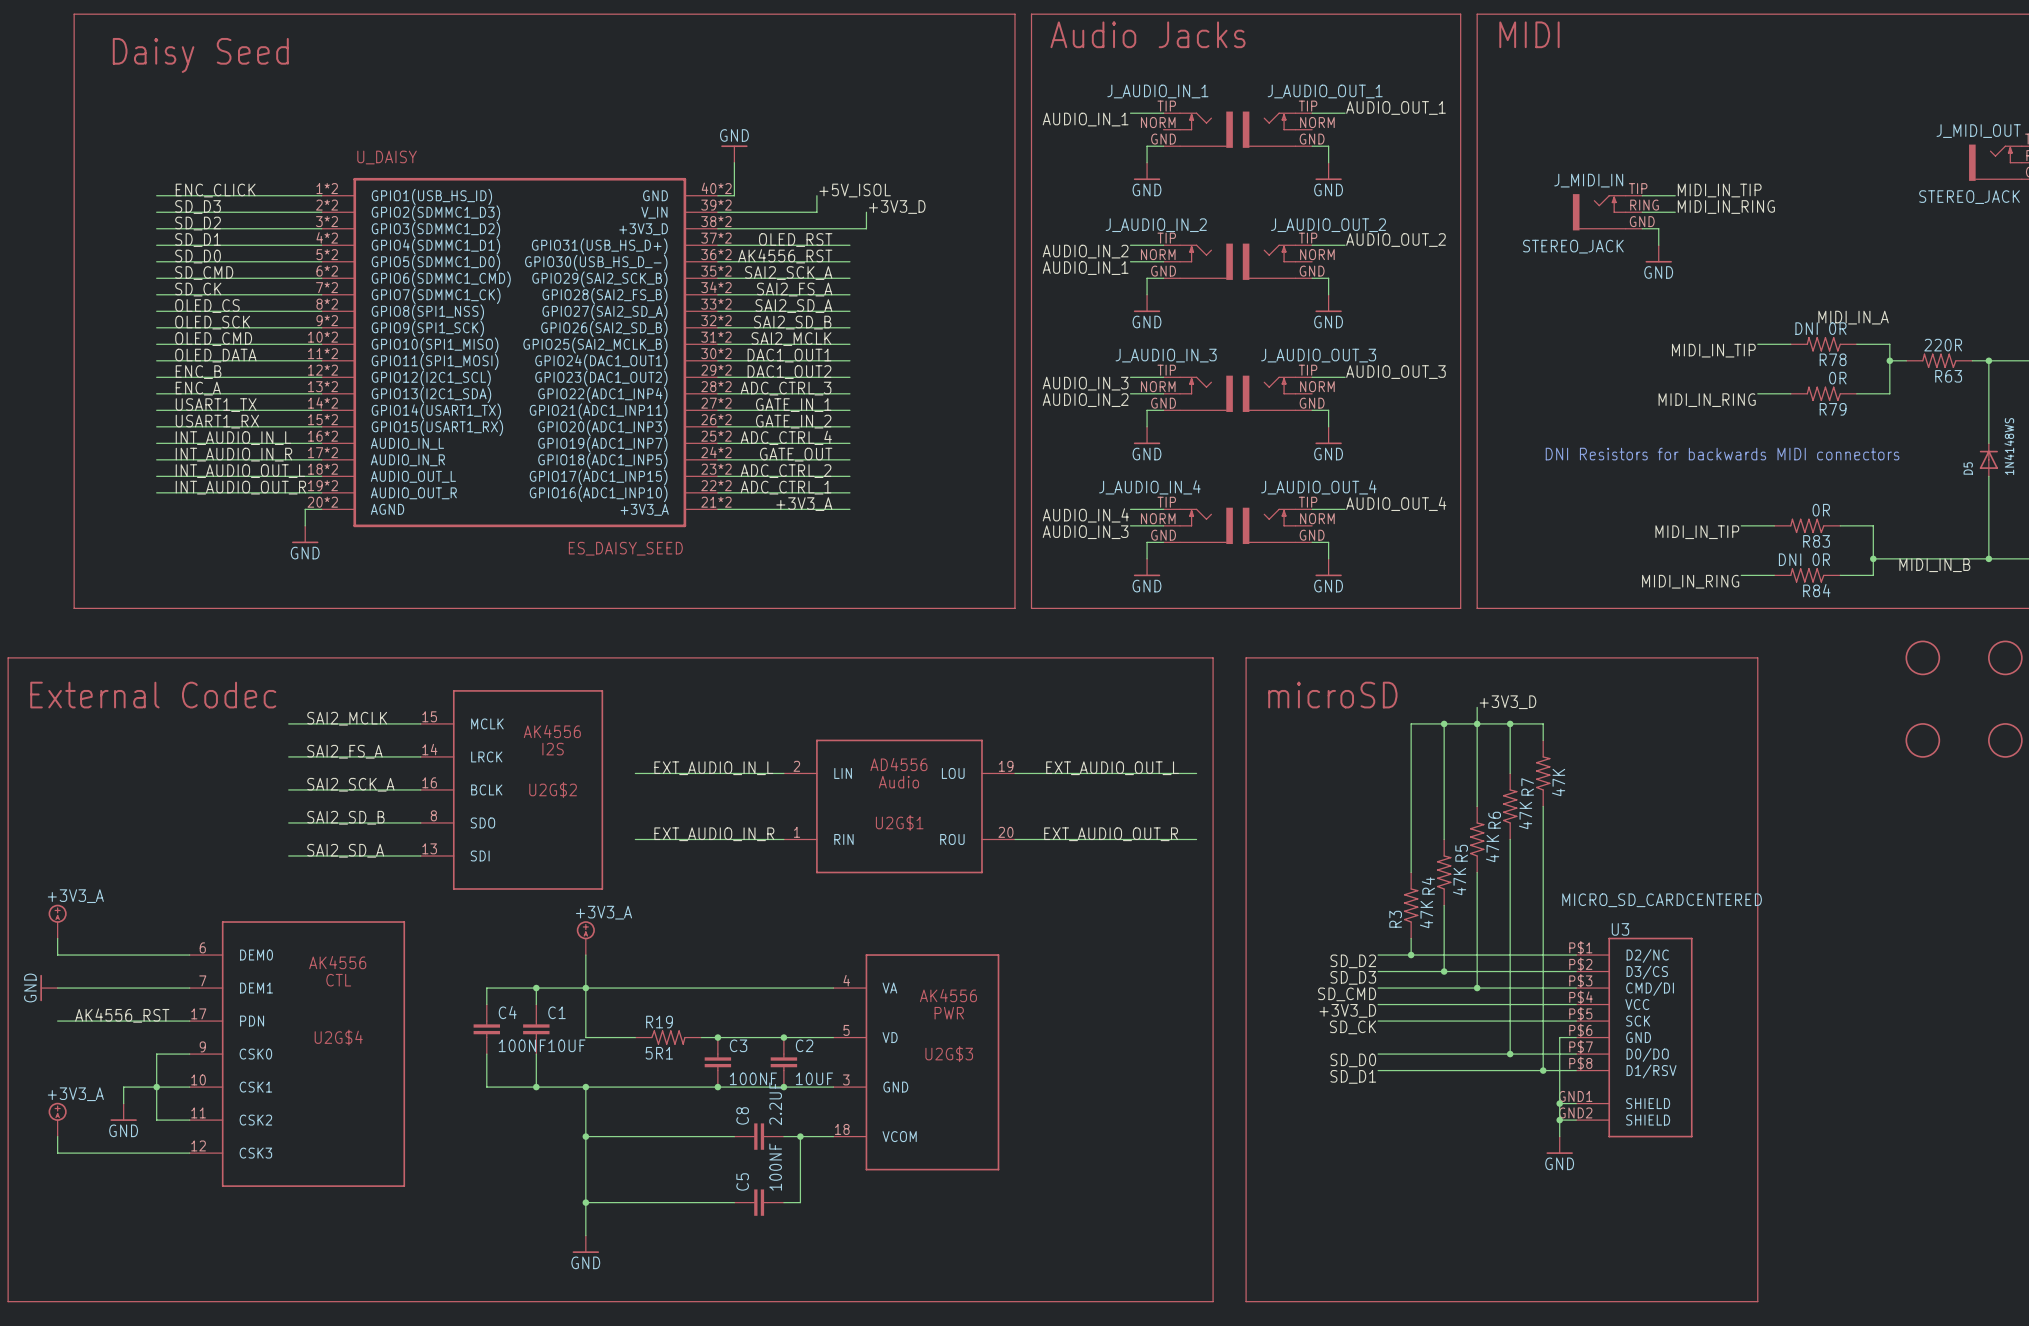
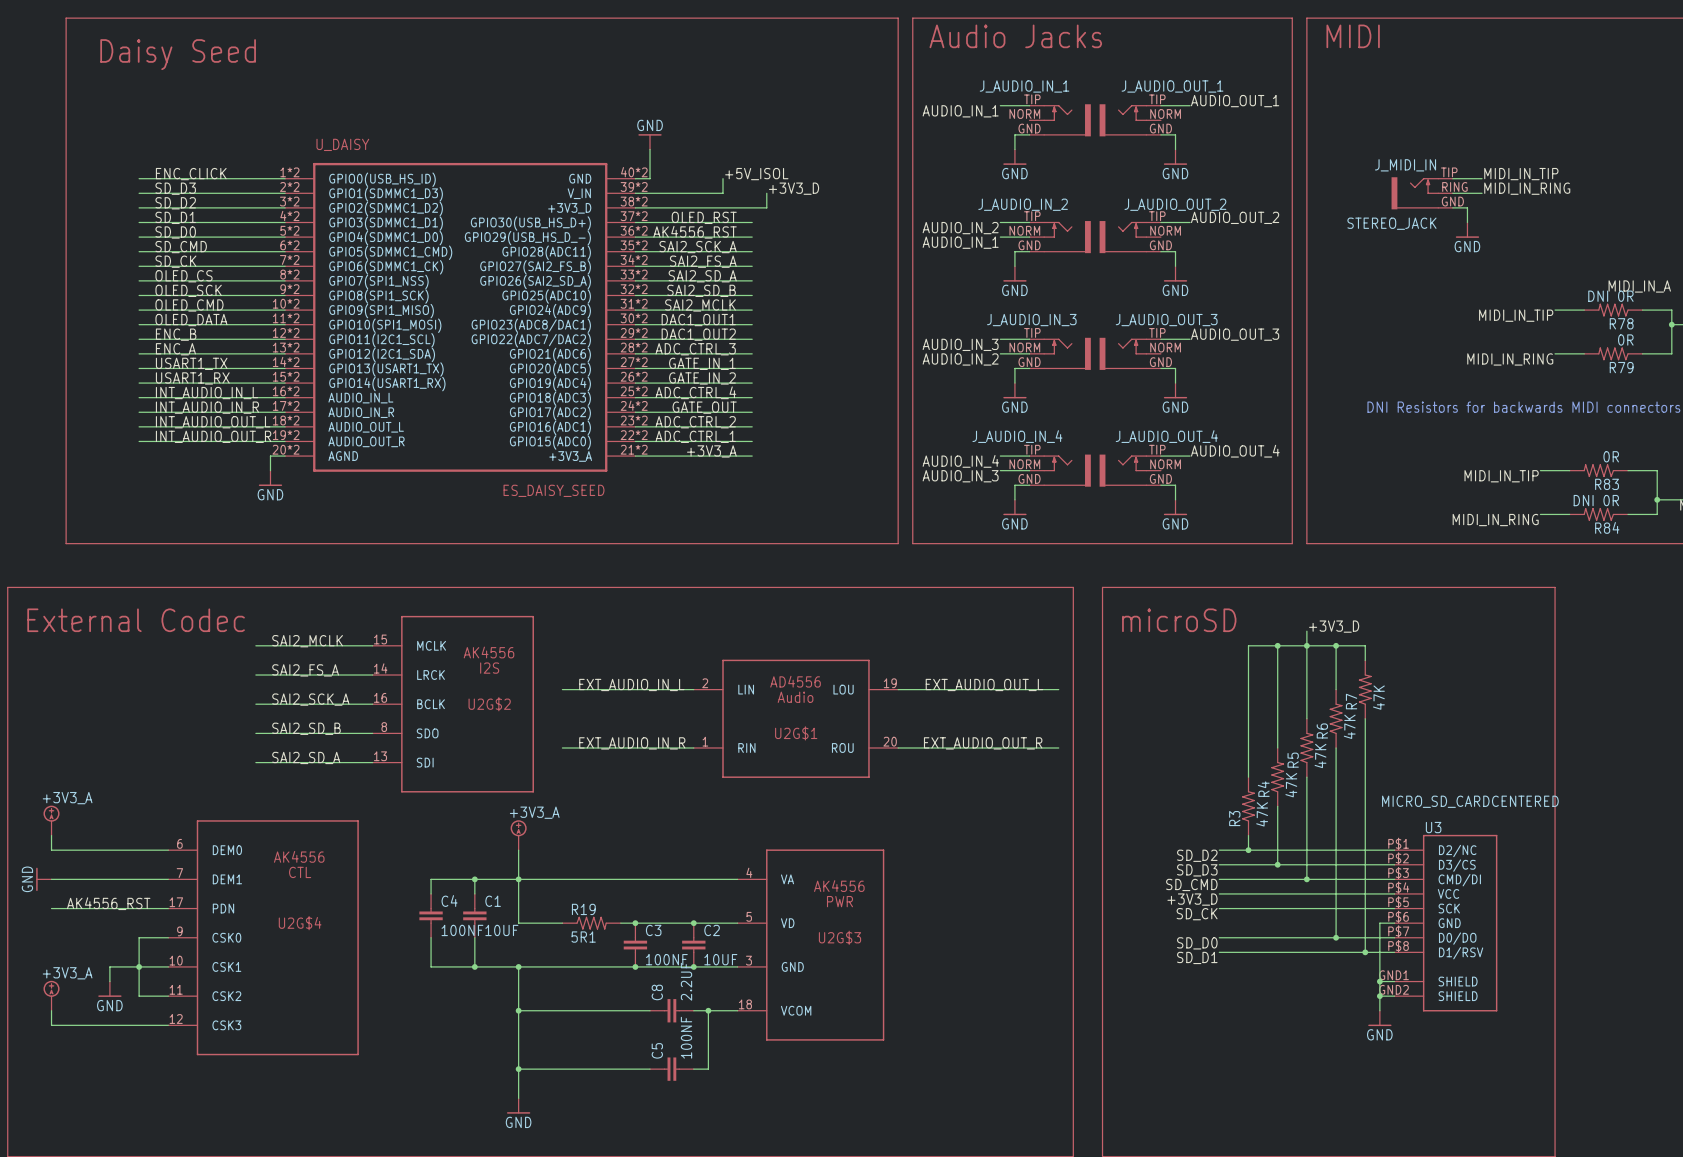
U_DAISY symbol: [321, 177, 718, 528] -> [285, 162, 636, 472]

